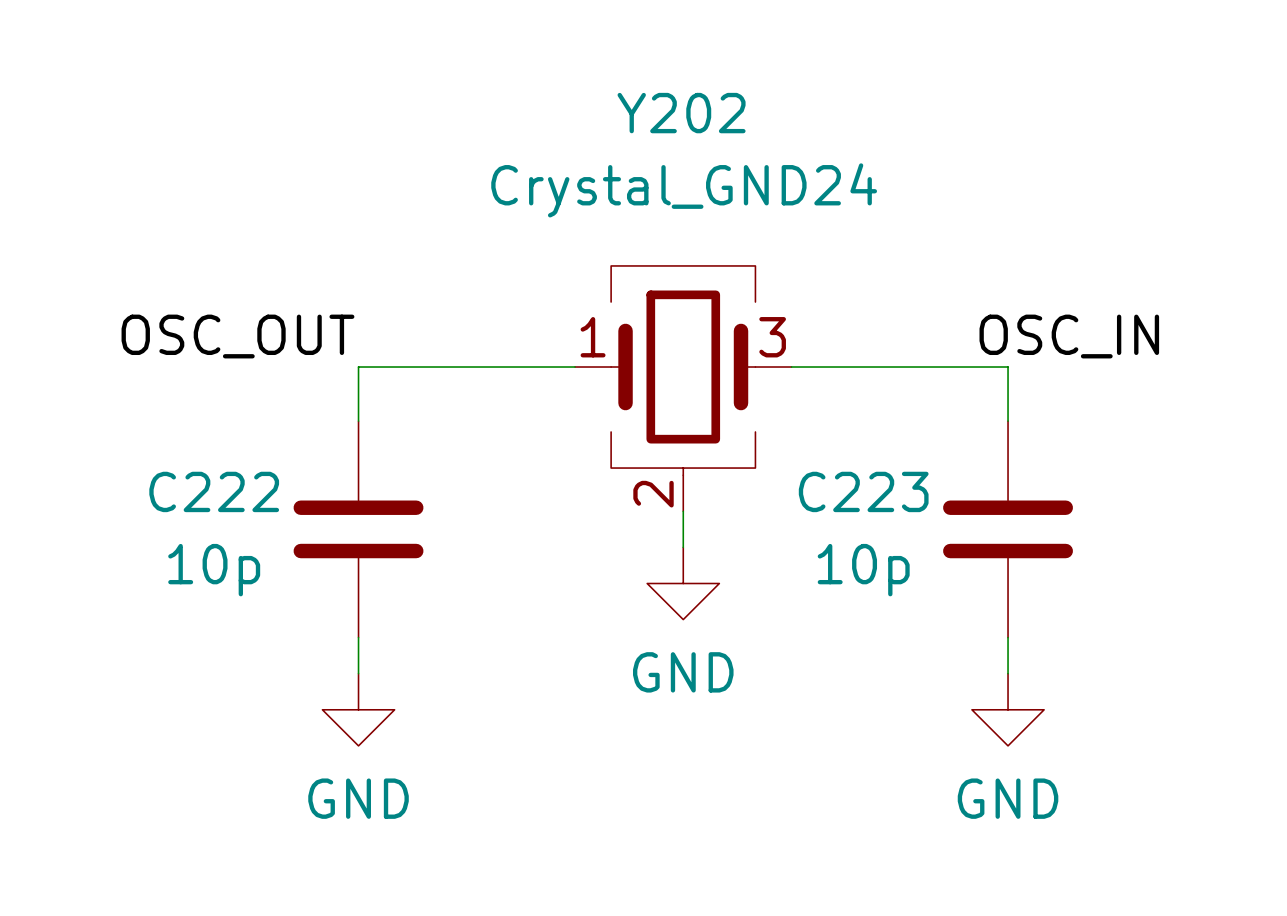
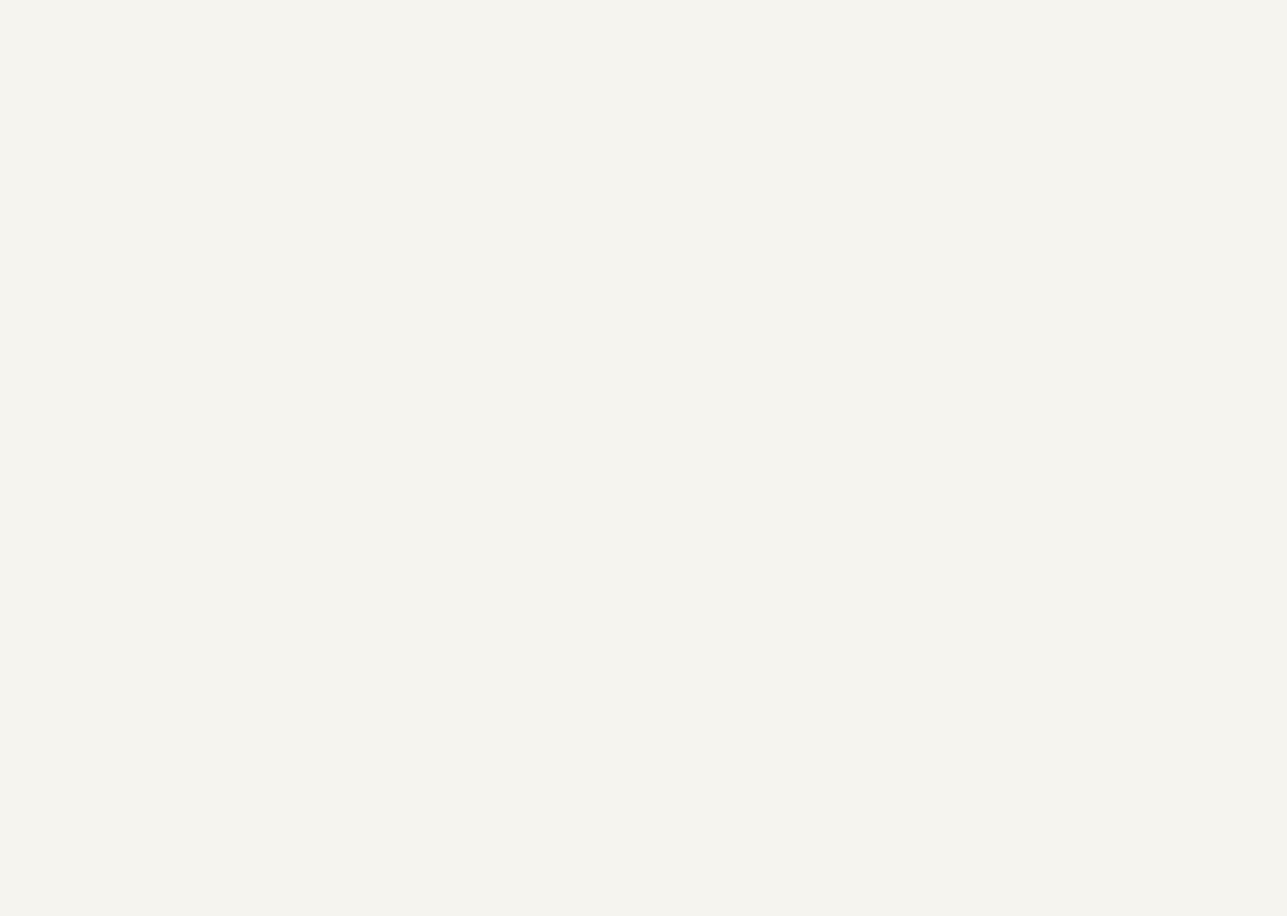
label: OSC_OUT (237, 336) -> none
label: OSC_IN (1069, 336) -> none
wire: (575, 367) (358, 367) (358, 421) -> none
wire: (791, 367) (1008, 367) (1008, 421) -> none
Y202: Crystal_GND24 (683, 388) -> none
wire: (683, 511) (683, 547) -> none
C222: 10p (358, 529) -> none
C223: 10p (1008, 529) -> none
power symbol: GND (683, 583) -> none
wire: (358, 637) (358, 673) -> none
wire: (1008, 637) (1008, 673) -> none
power symbol: GND (358, 709) -> none
power symbol: GND (1008, 709) -> none

